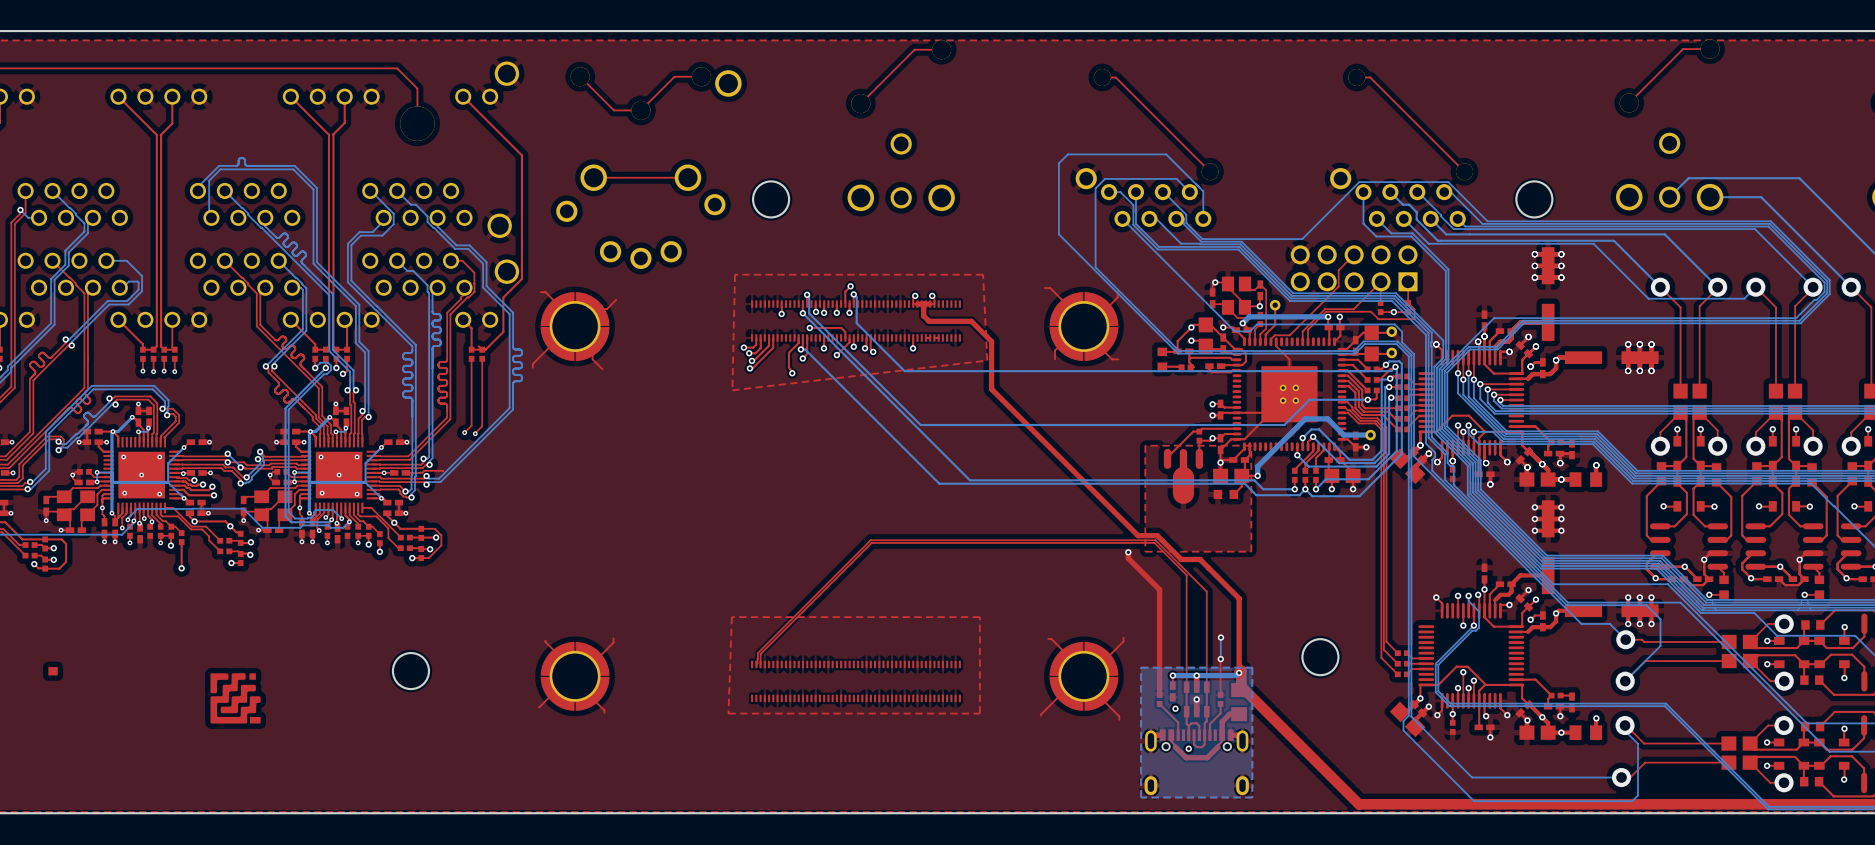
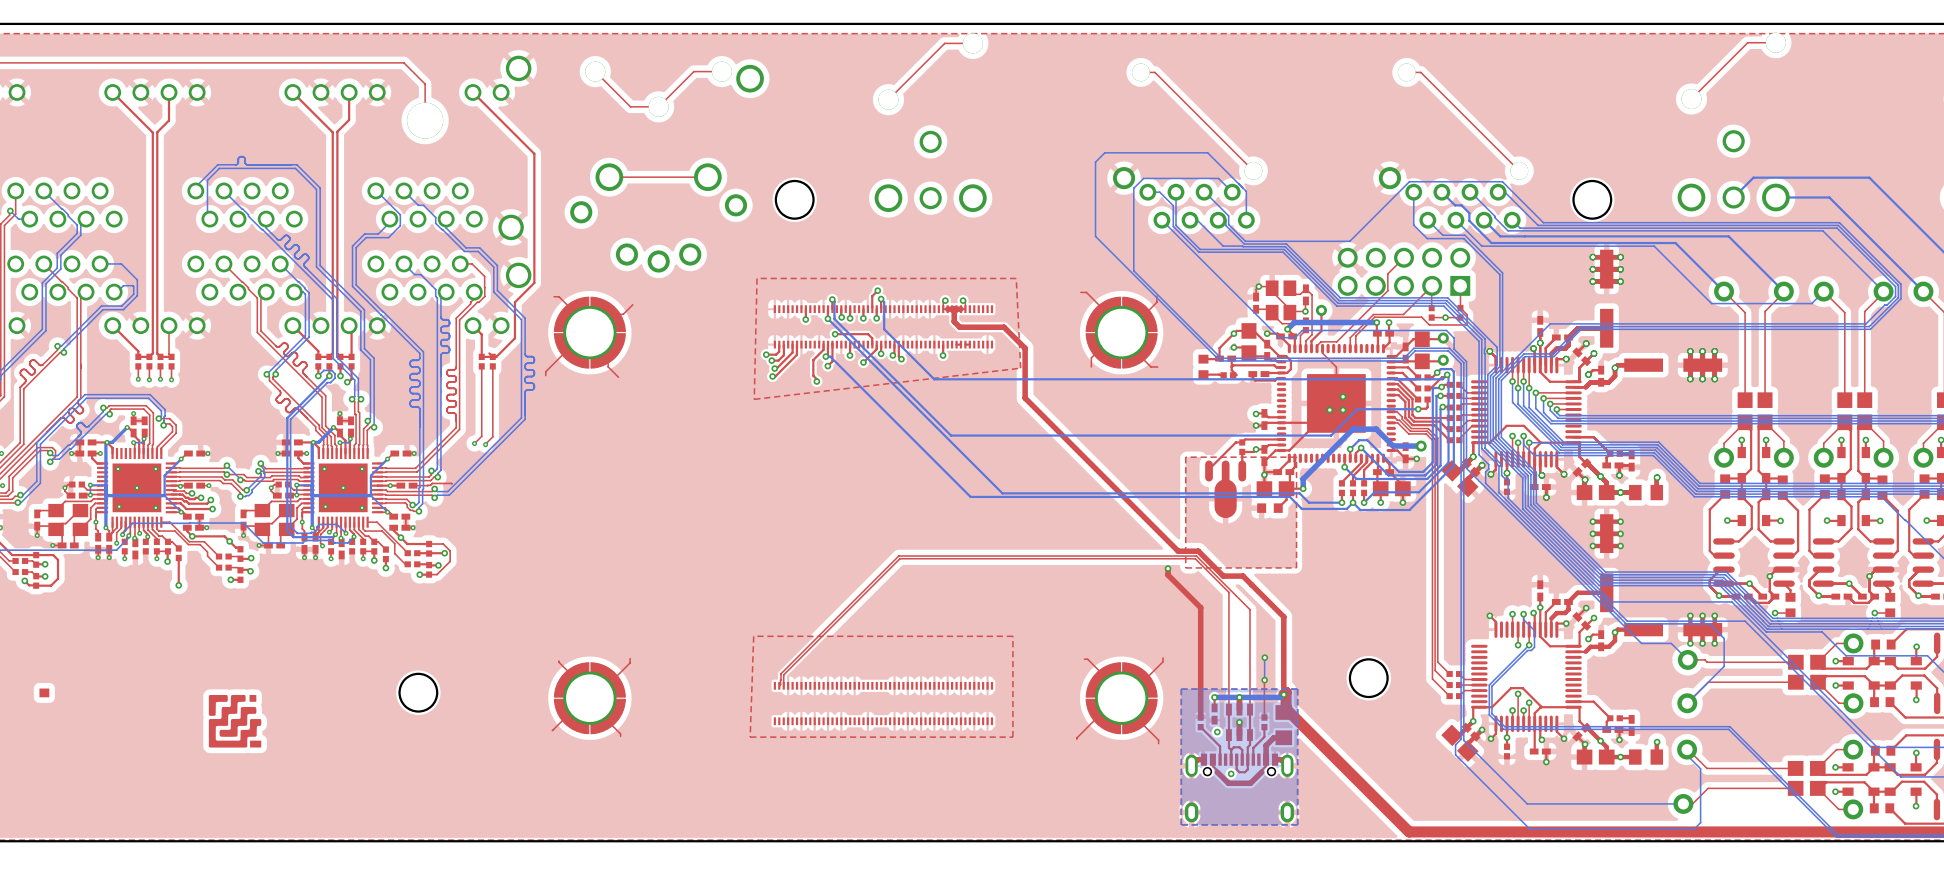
part footprint: [1232, 337, 1347, 452] -> [1276, 343, 1396, 463]

